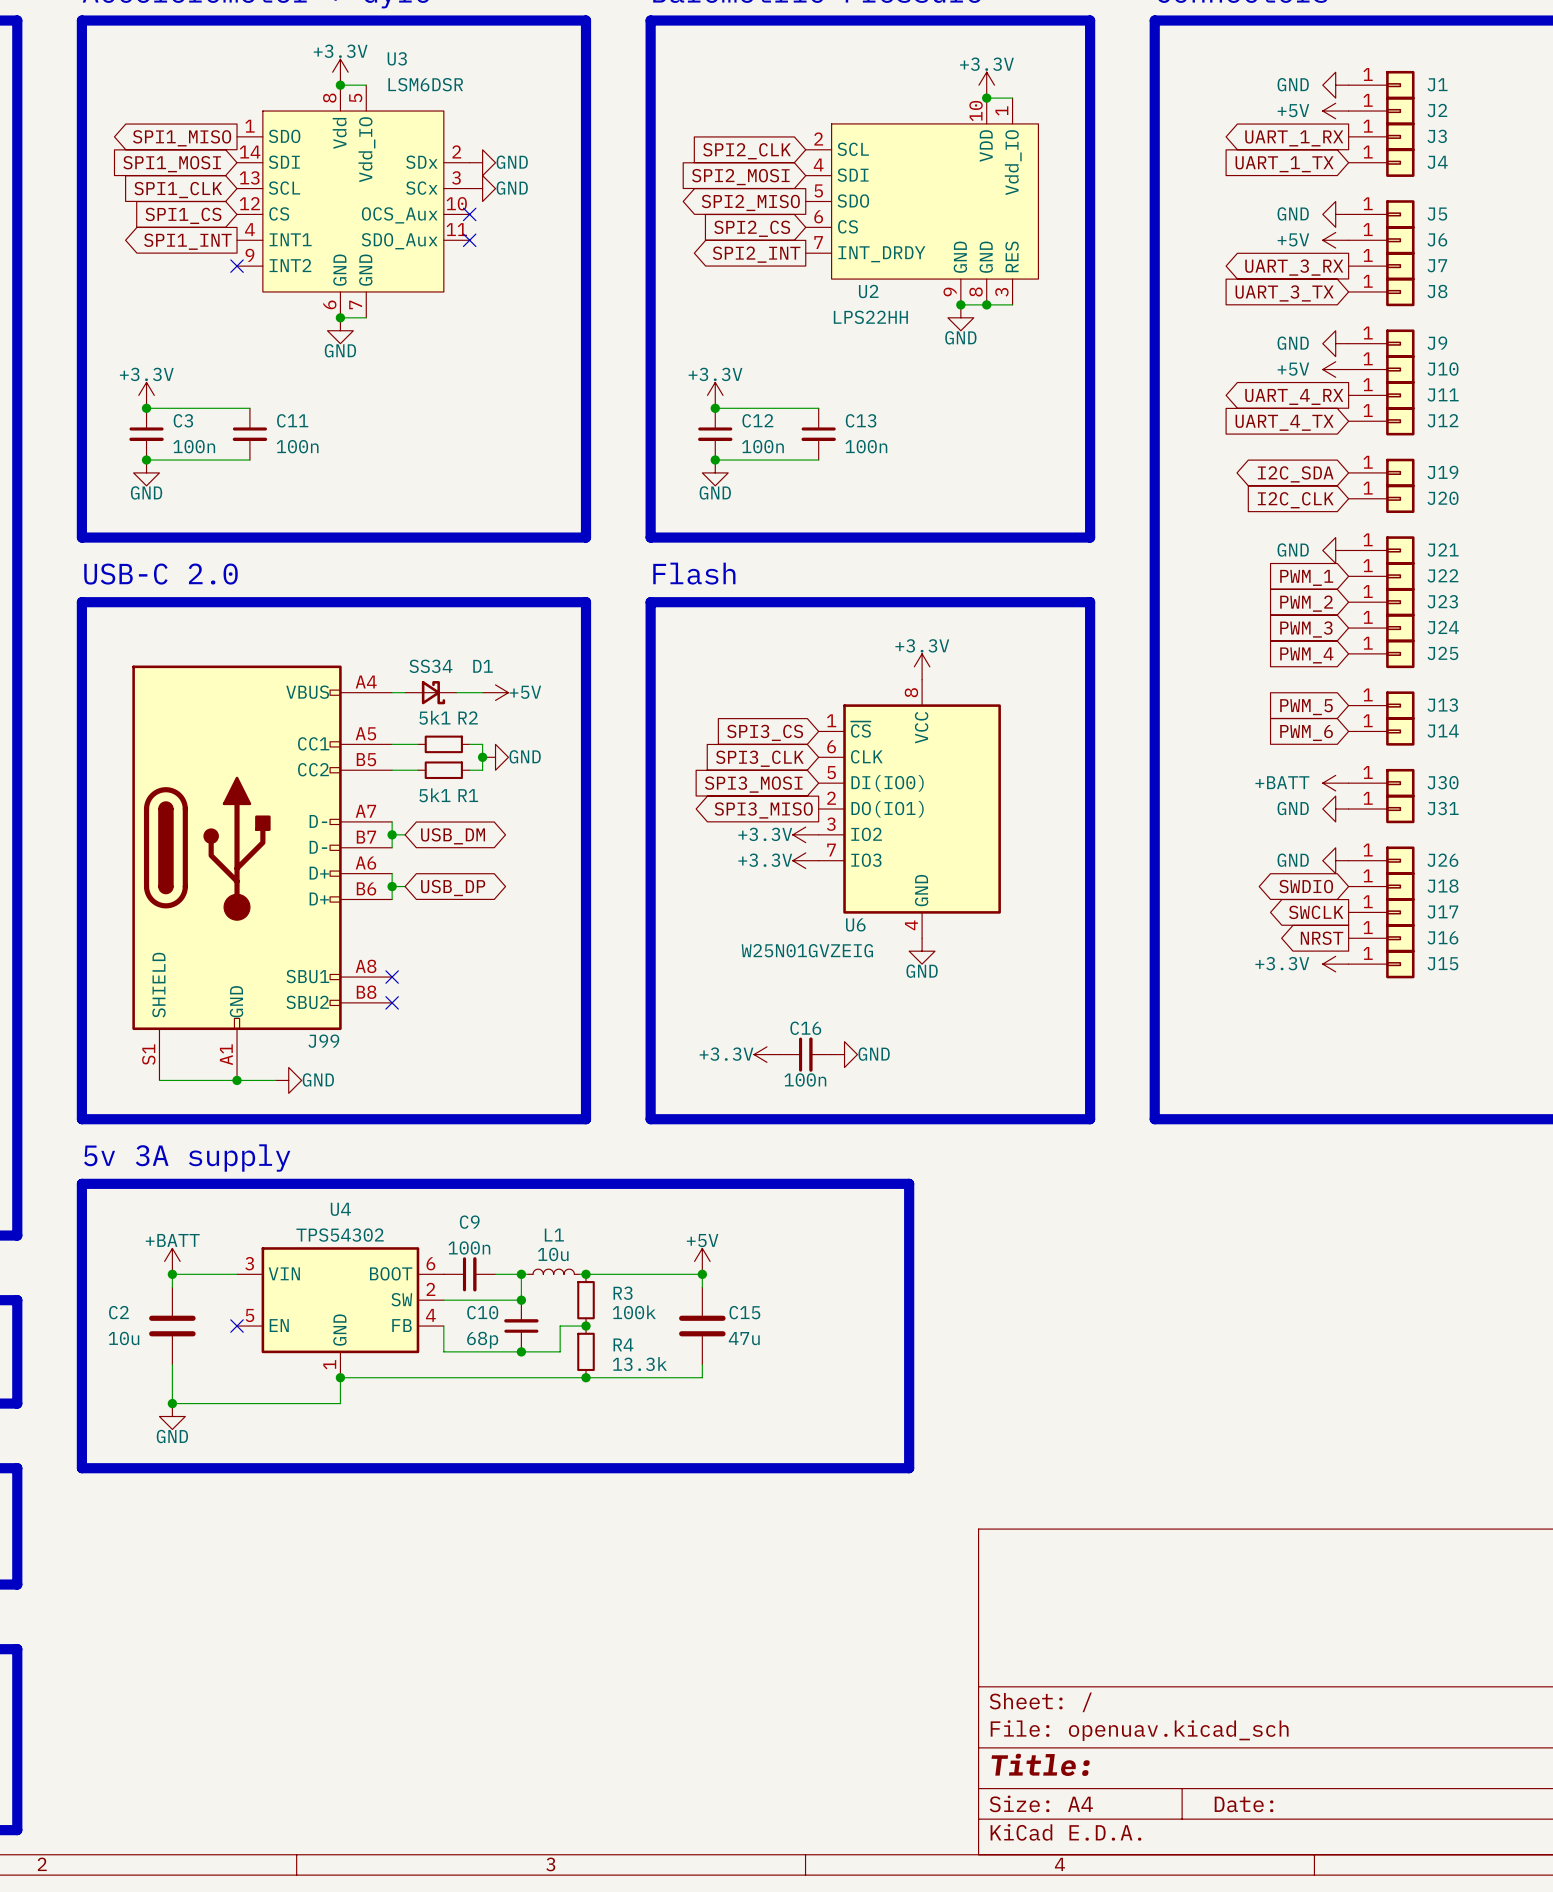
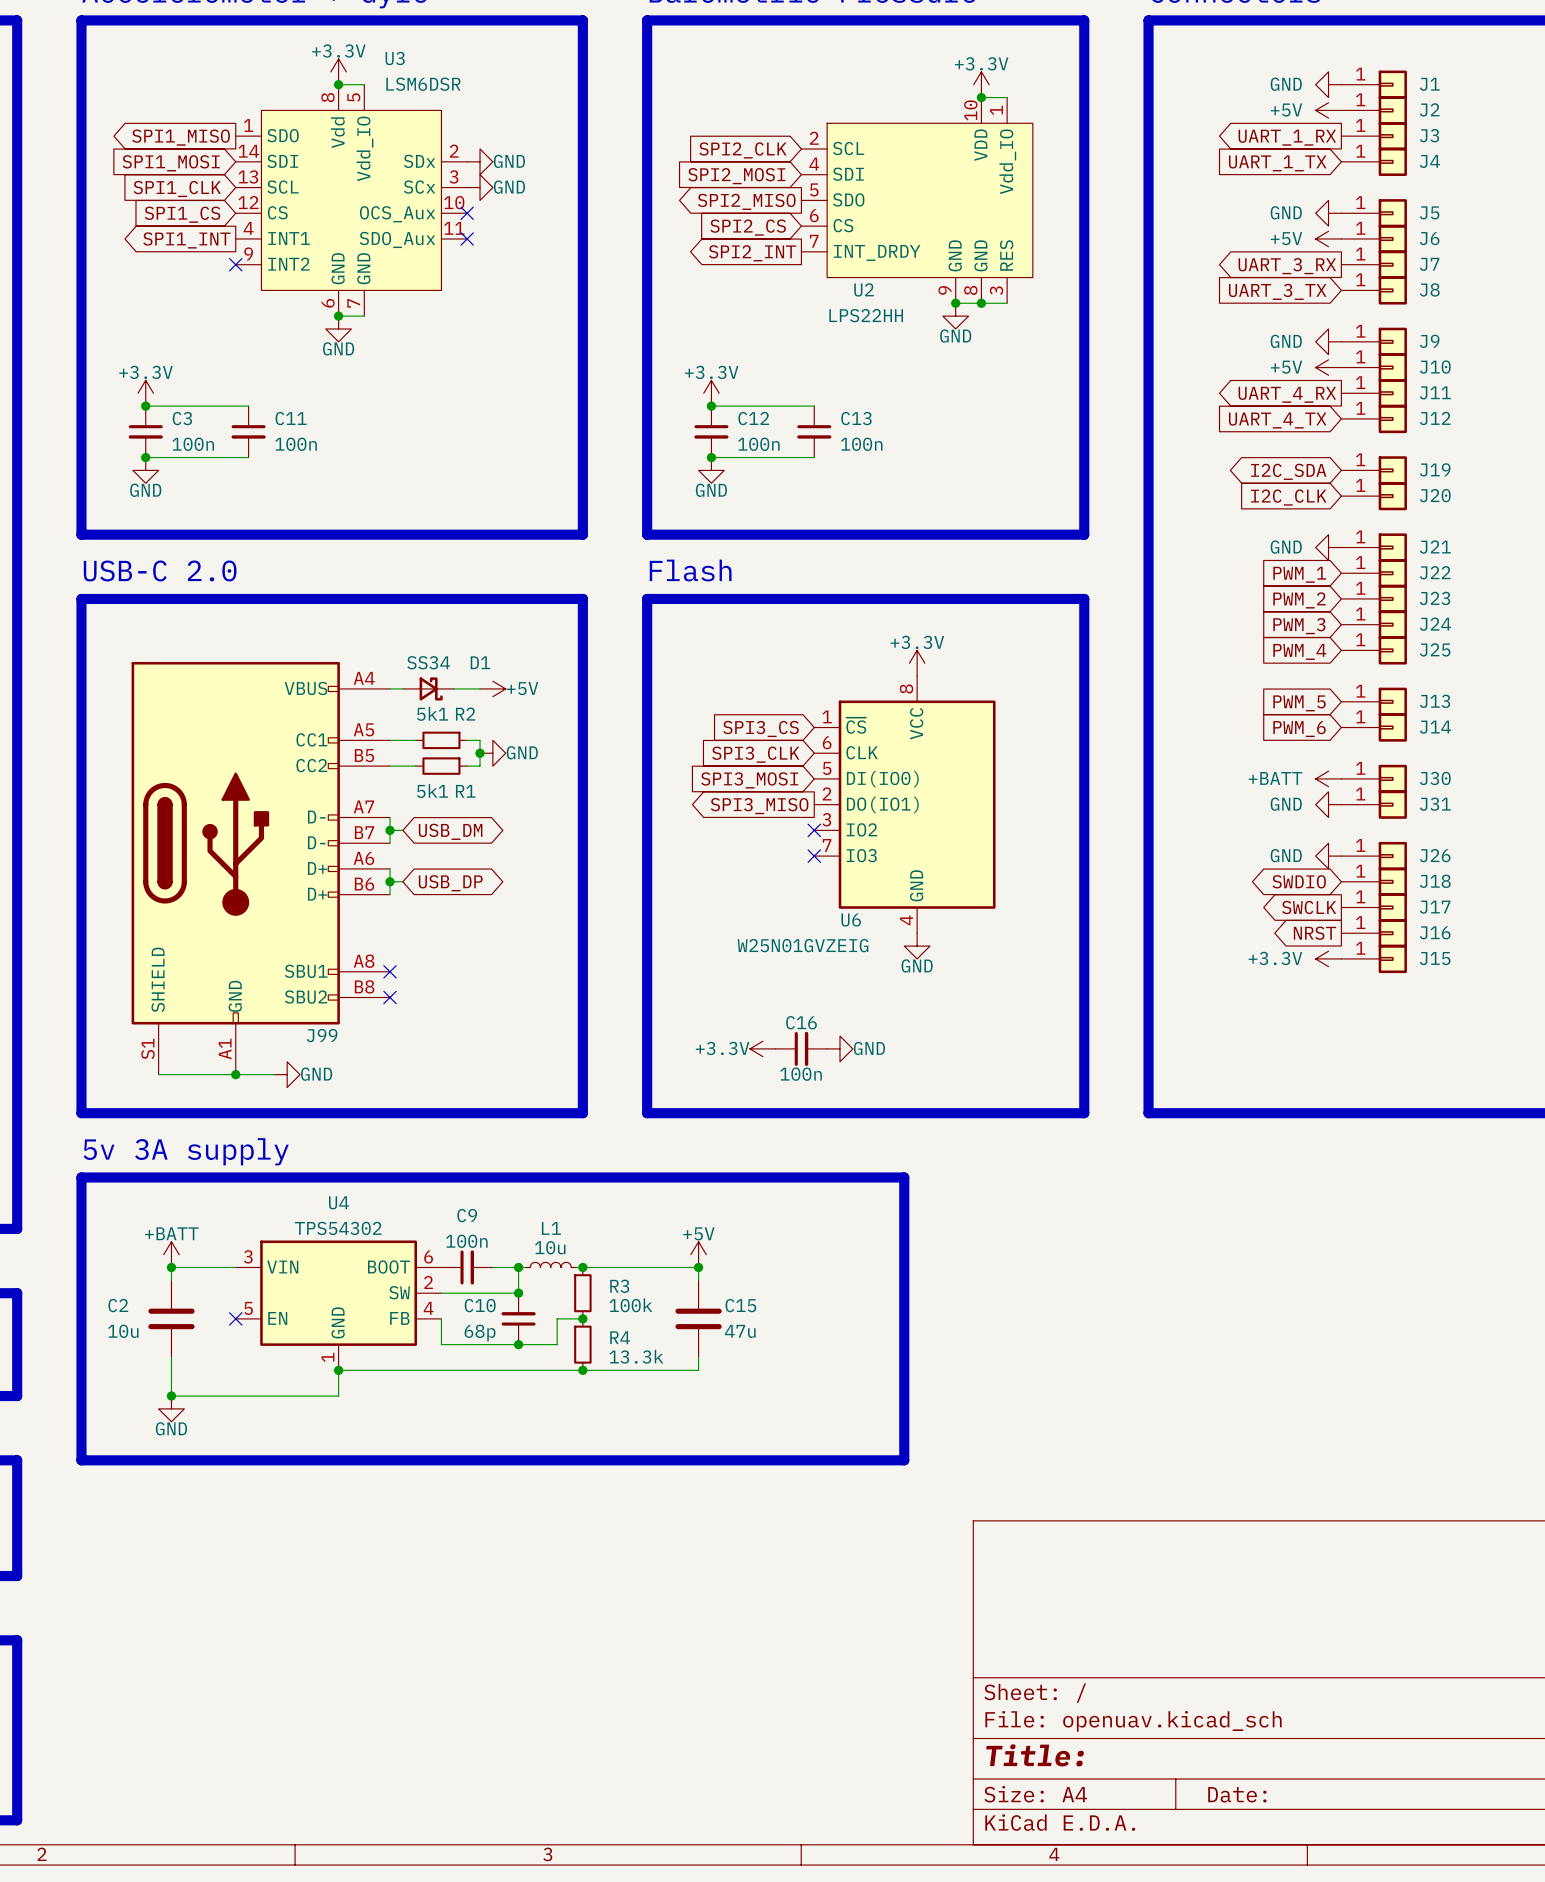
power symbol: +3.3V (805, 834) -> none
no-connect mark: none -> (814, 830)
power symbol: +3.3V (805, 860) -> none
no-connect mark: none -> (814, 856)

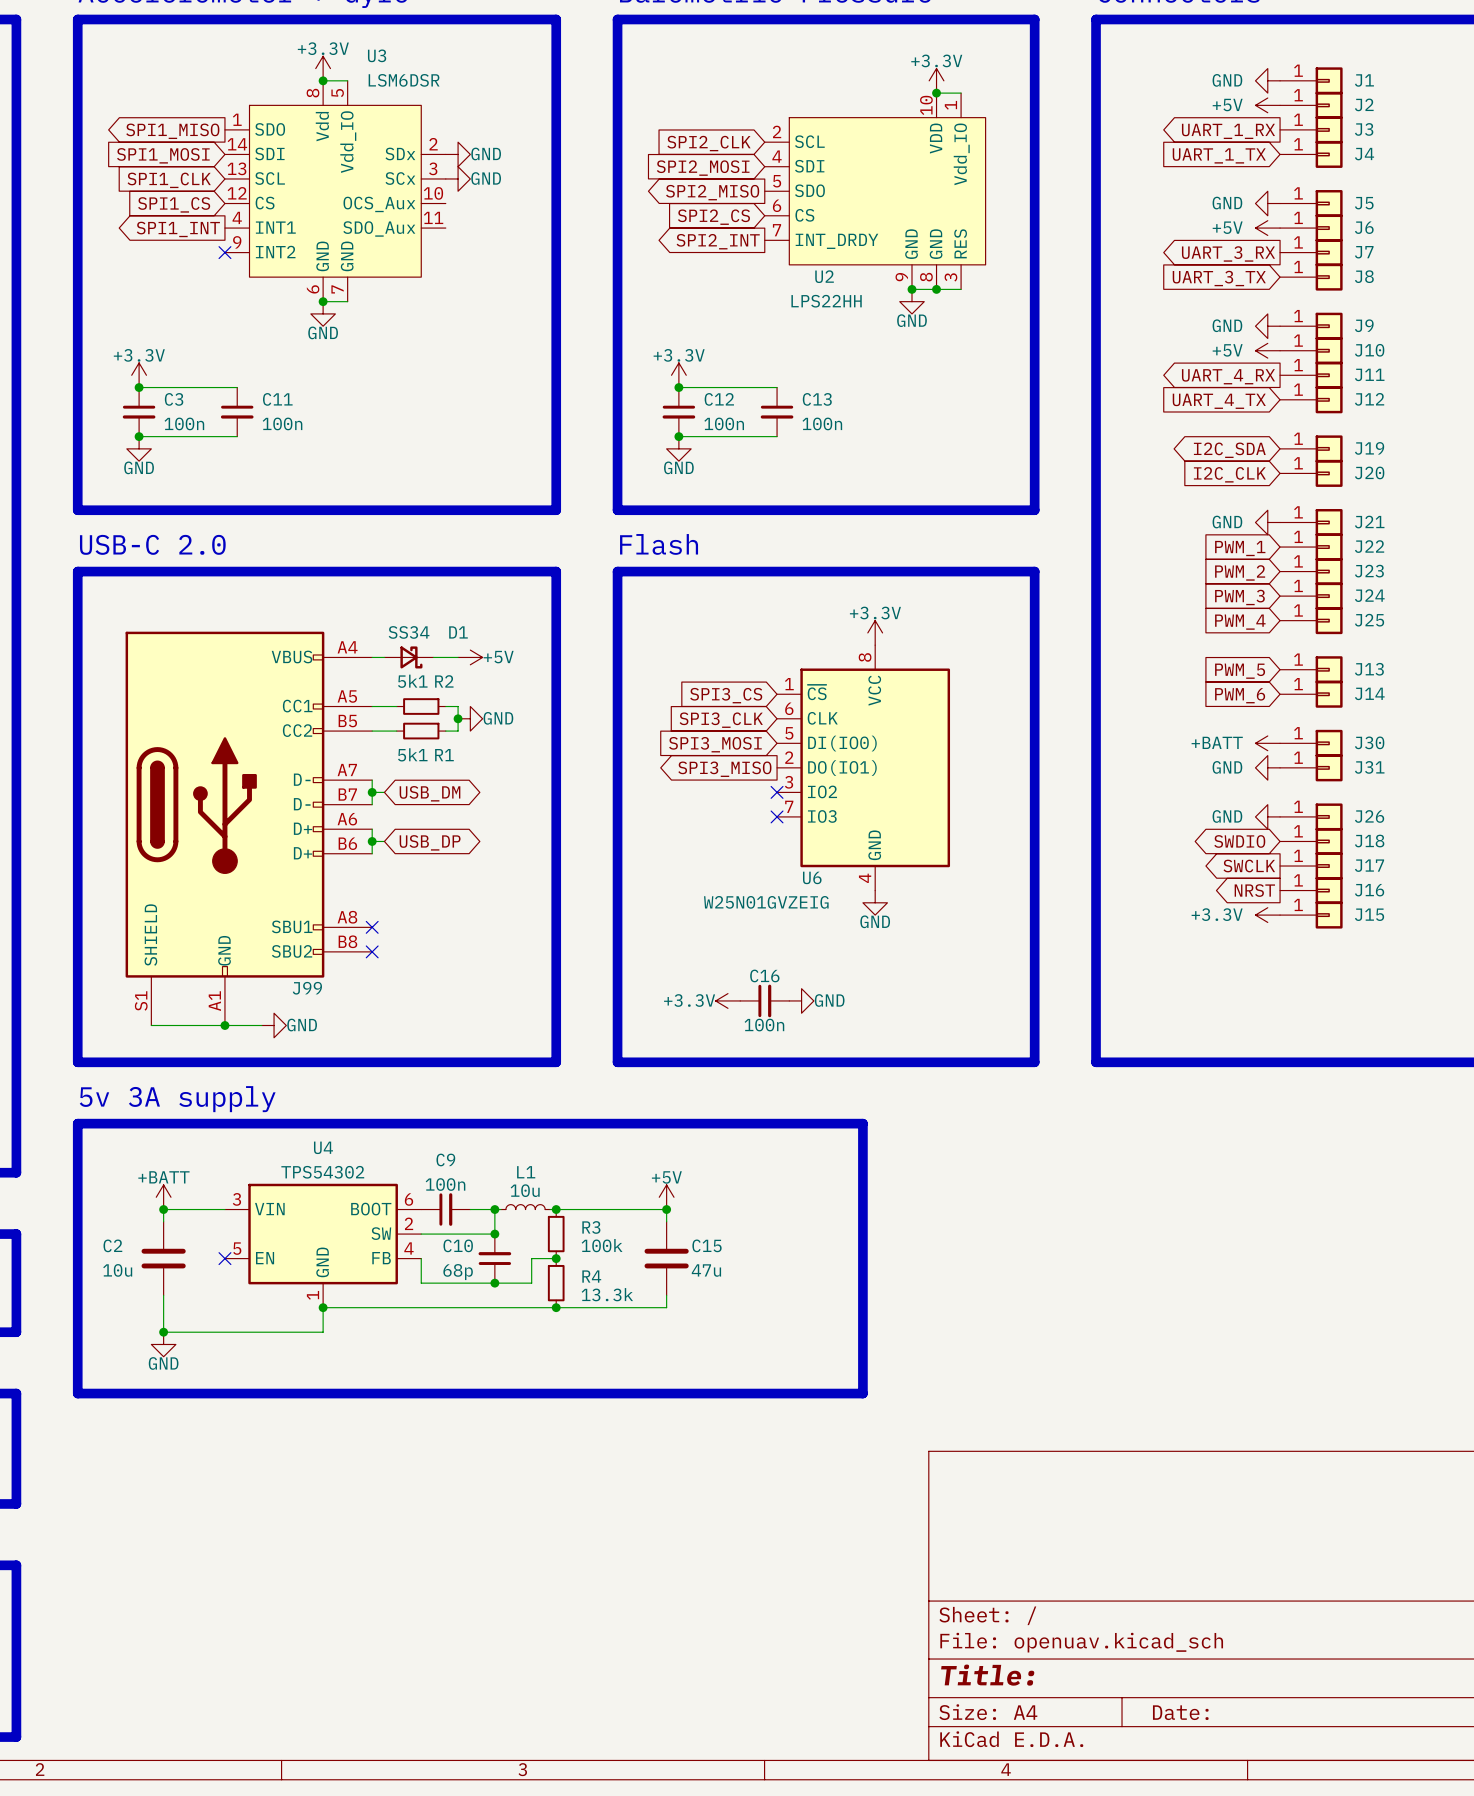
no-connect mark: (467, 213) -> none
no-connect mark: (467, 238) -> none

